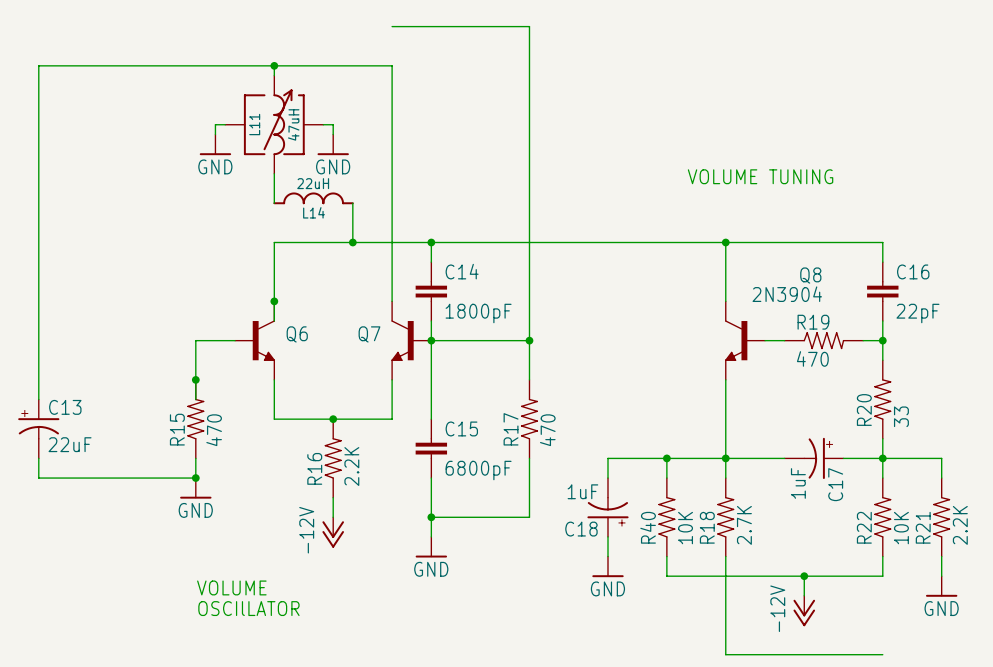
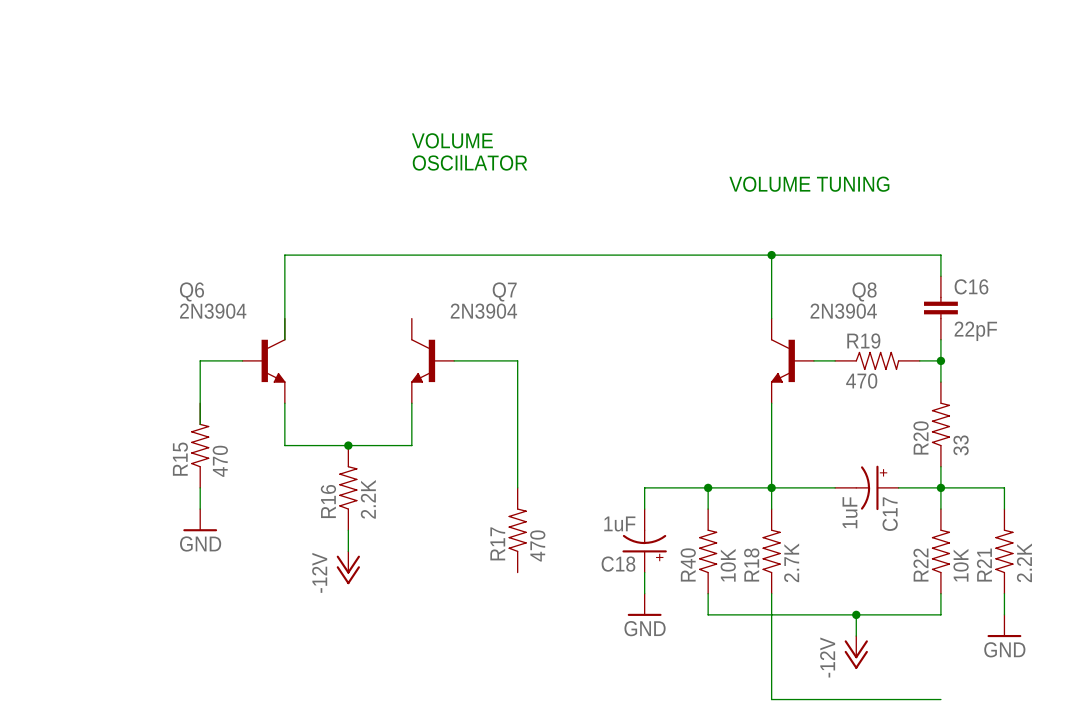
wire: (392, 26) (529, 26) (529, 379) -> none
wire: (274, 65) (274, 75) -> none
junction: (274, 65) -> none
wire: (225, 124) (215, 124) (215, 134) -> none
L11: 47uH (274, 124) -> none
wire: (323, 124) (333, 124) (333, 134) -> none
text: none -> VOLUME (452, 140)
power symbol: GND (215, 144) -> none
power symbol: GND (333, 144) -> none
text: none -> OSCIlLATOR (470, 162)
wire: (274, 173) (274, 203) -> none
L14: 22uH (313, 198) -> none
wire: (352, 203) (352, 242) -> none
junction: (352, 242) -> none
wire: (431, 242) (431, 262) -> none
junction: (431, 242) -> none
C14: 1800pF (431, 291) -> none
Q6 value: none -> 2N3904 (213, 311)
Q7 value: none -> 2N3904 (483, 311)
junction: (274, 301) -> none
wire: (392, 301) (392, 65) (38, 65) (38, 399) -> none
wire: (431, 321) (431, 419) -> none
Q6 name position: Q6 (297, 334) -> Q6 (192, 291)
Q7 name position: Q7 (369, 334) -> Q7 (504, 291)
junction: (431, 340) -> none
wire: (490, 340) (529, 340) -> (517, 360) (517, 487)
junction: (529, 340) -> none
junction: (195, 379) -> none
R17 position: (529, 419) -> (517, 530)
C13: 22uF (38, 428) -> none
C15: 6800pF (431, 448) -> none
wire: (38, 458) (38, 478) (195, 478) -> none
wire: (529, 458) (529, 517) (431, 517) -> none
junction: (195, 478) -> none
wire: (431, 478) (431, 536) -> none
junction: (431, 517) -> none
power symbol: GND (431, 547) -> none
text: VOLUME (231, 587) -> none
text: OSCIlLATOR (248, 608) -> none

